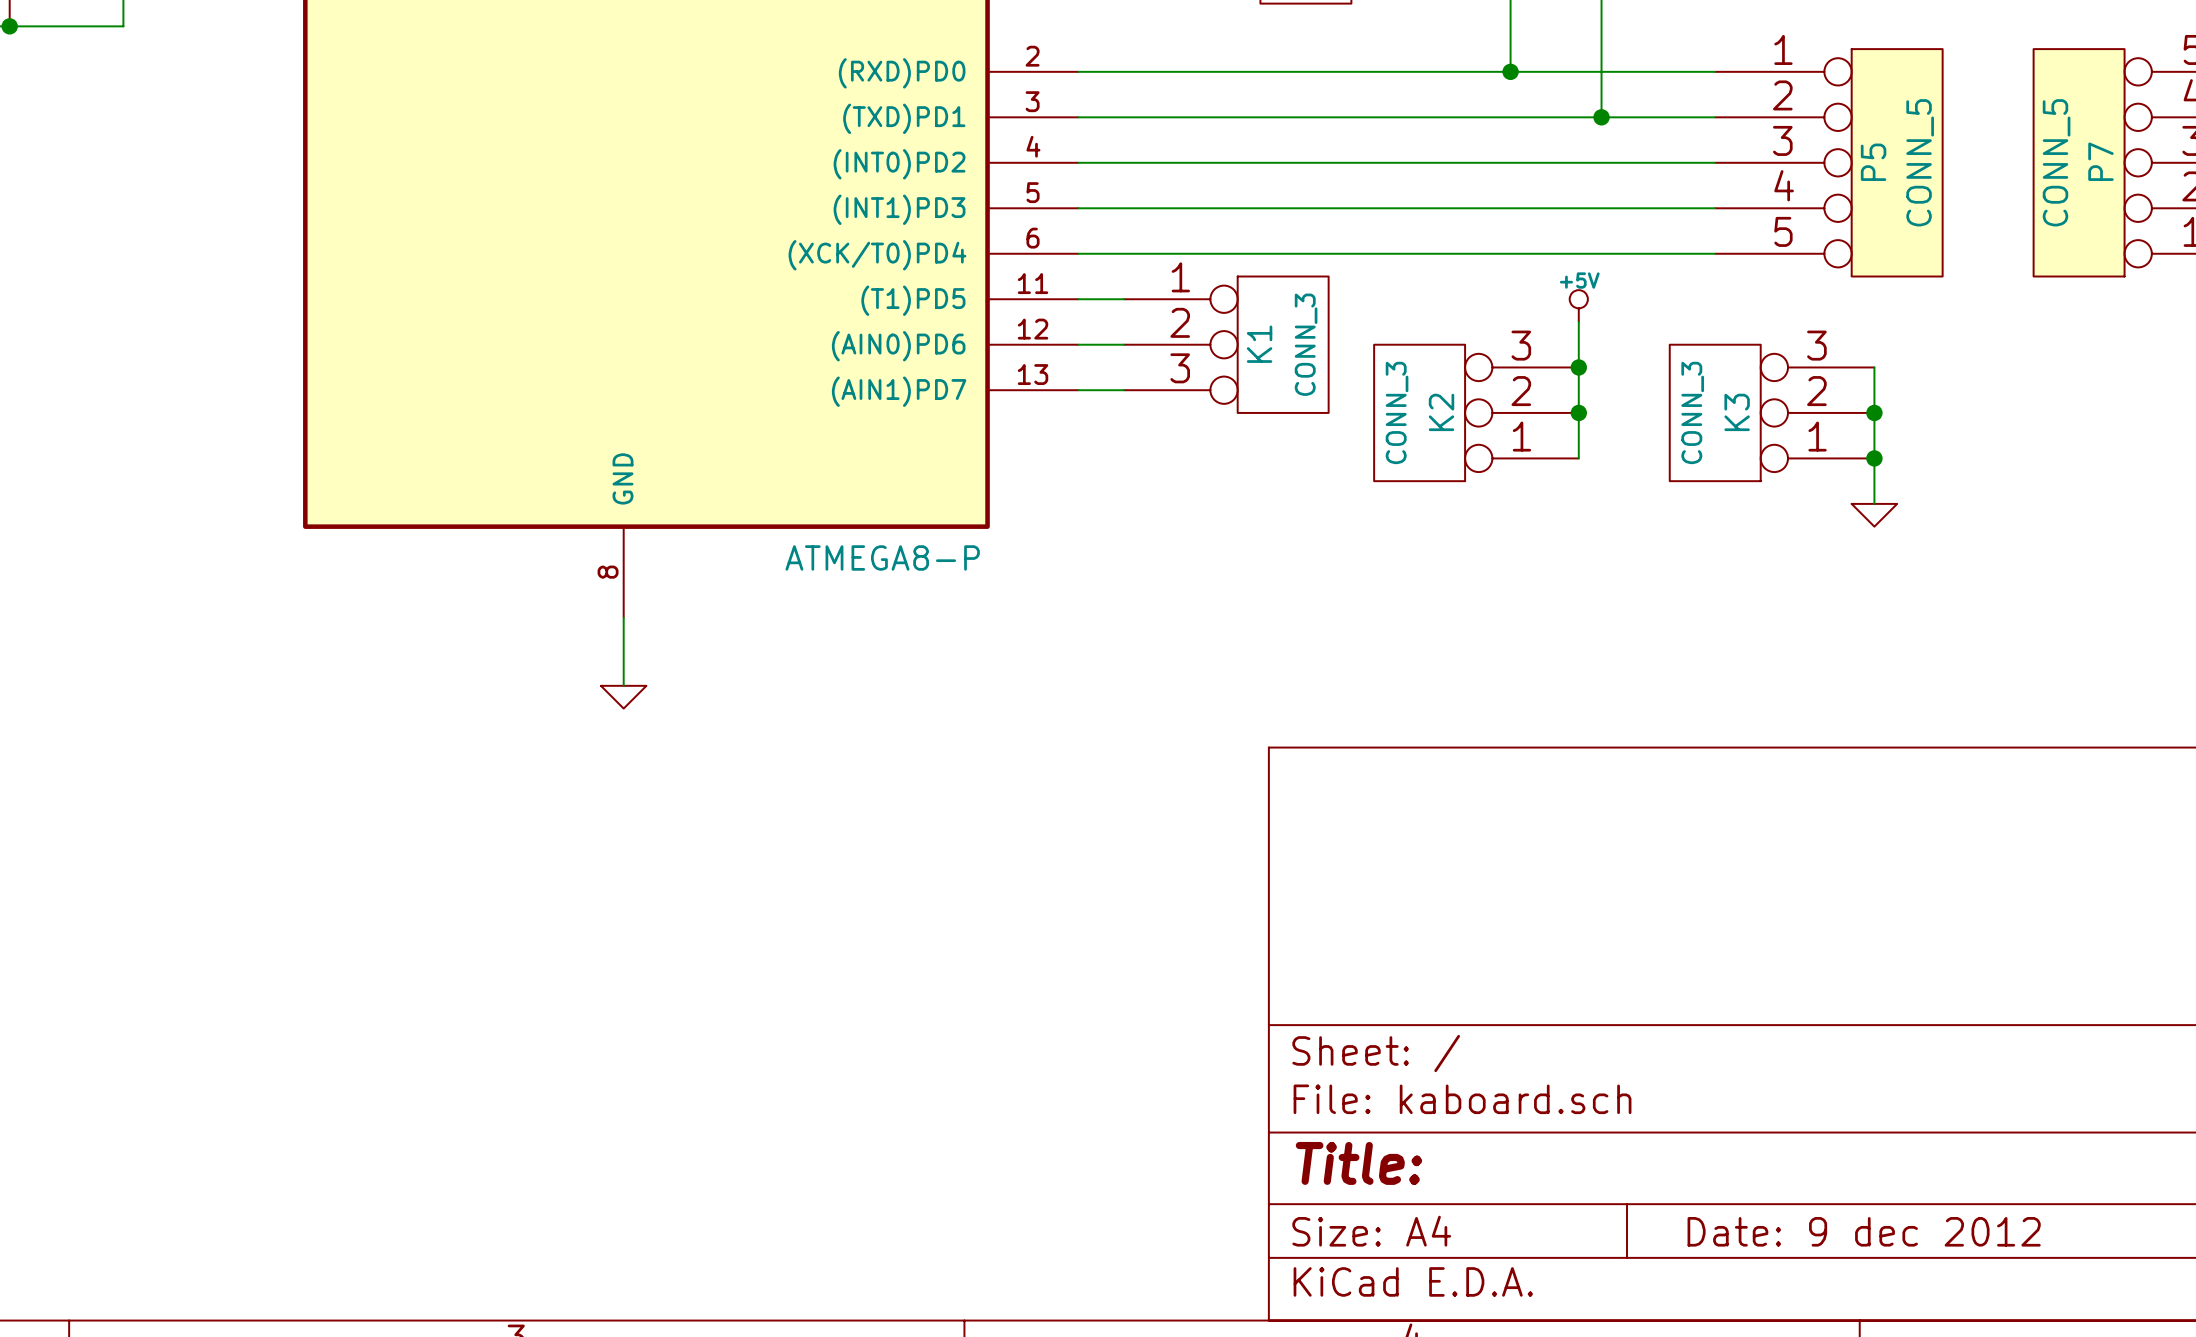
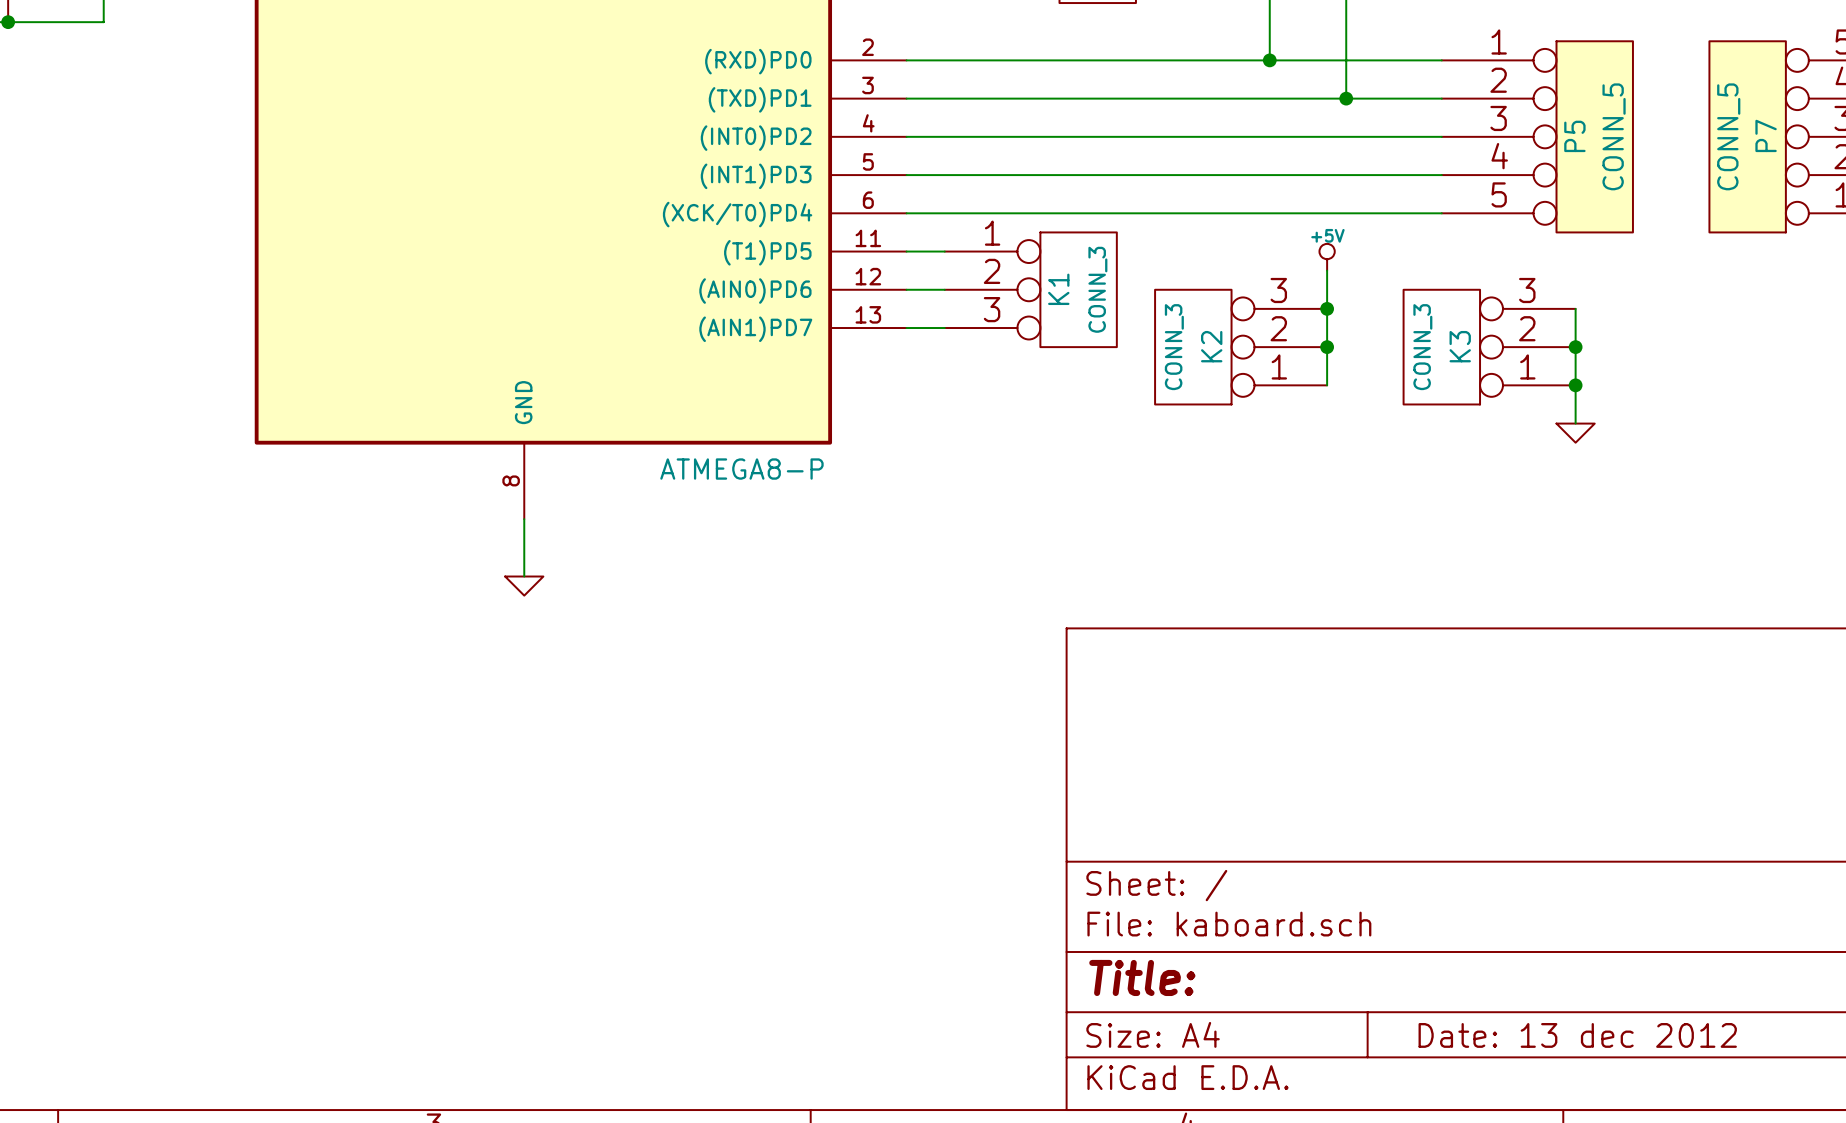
title block: Date: 9 dec 2012 (1864, 1231) -> Date: 13 dec 2012 (1577, 1035)

